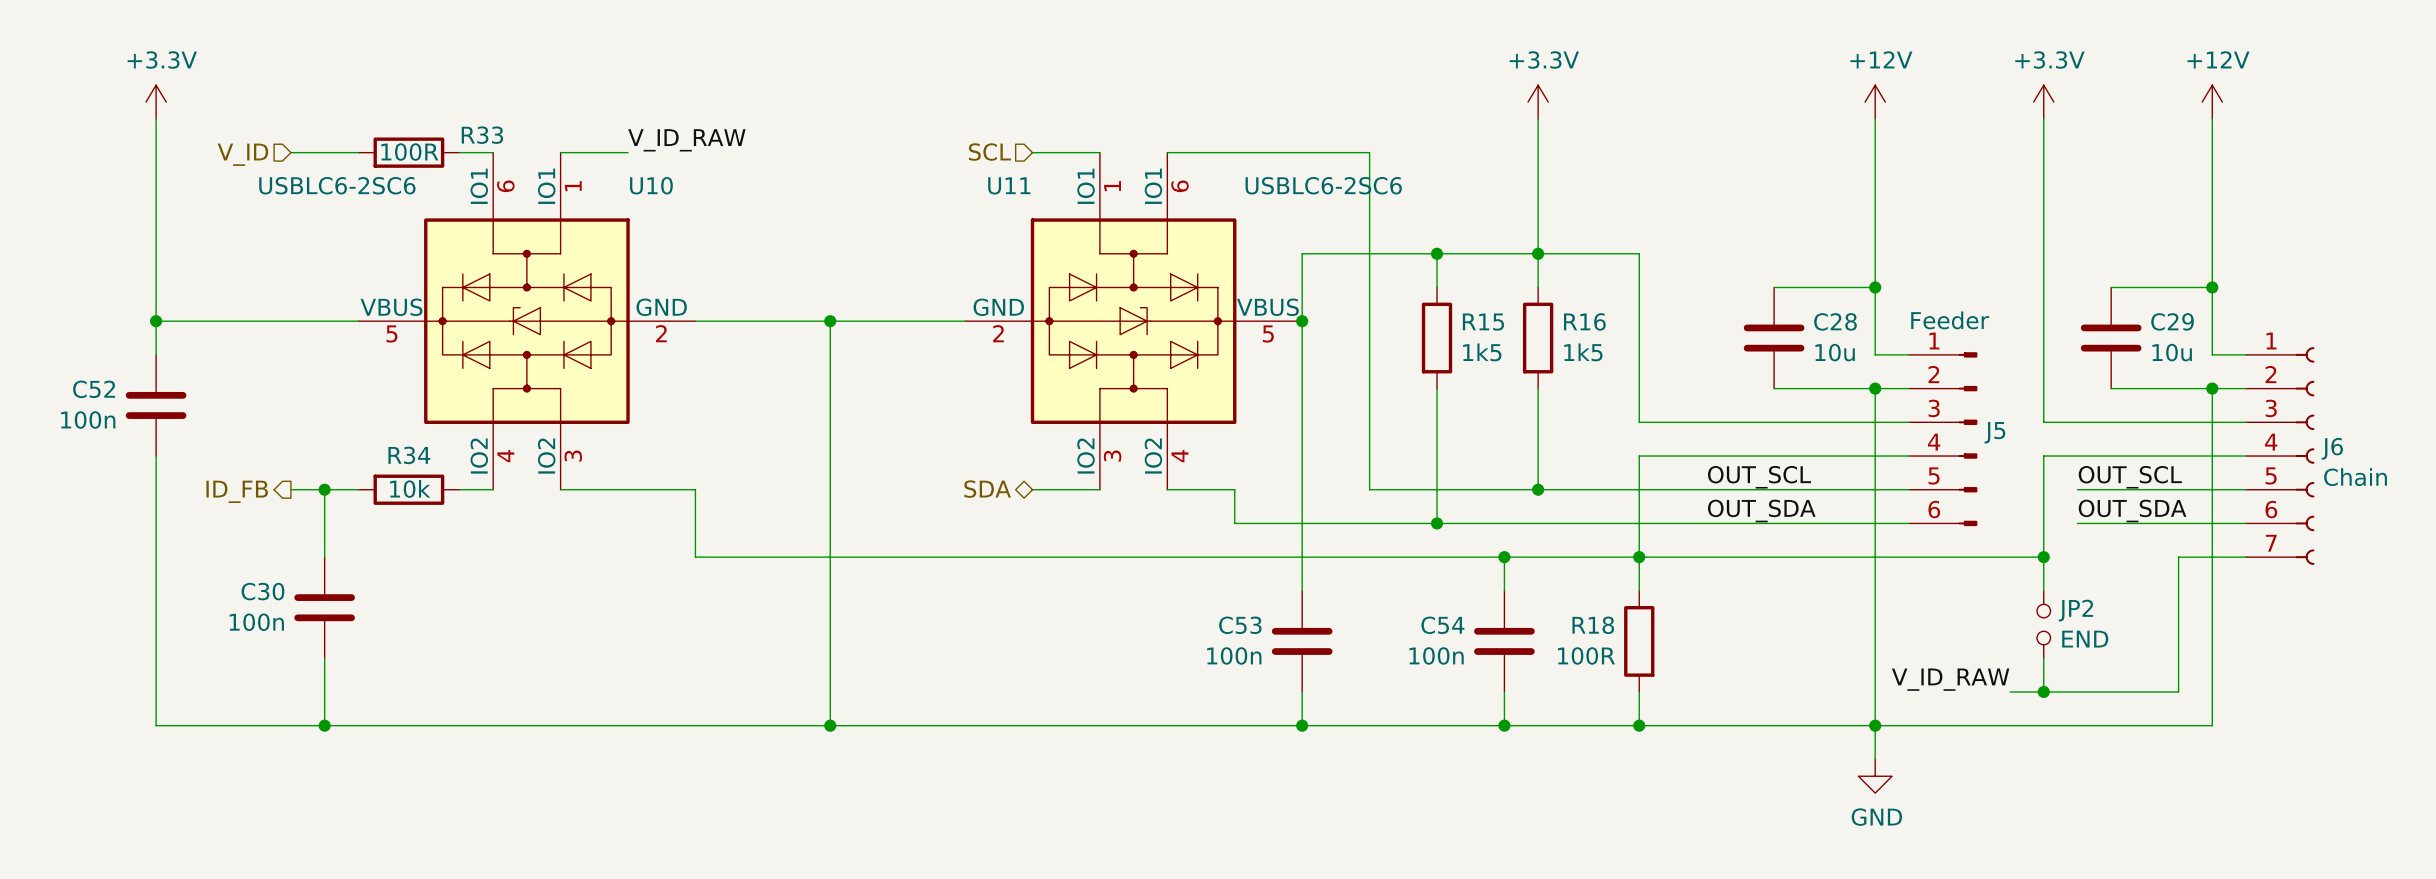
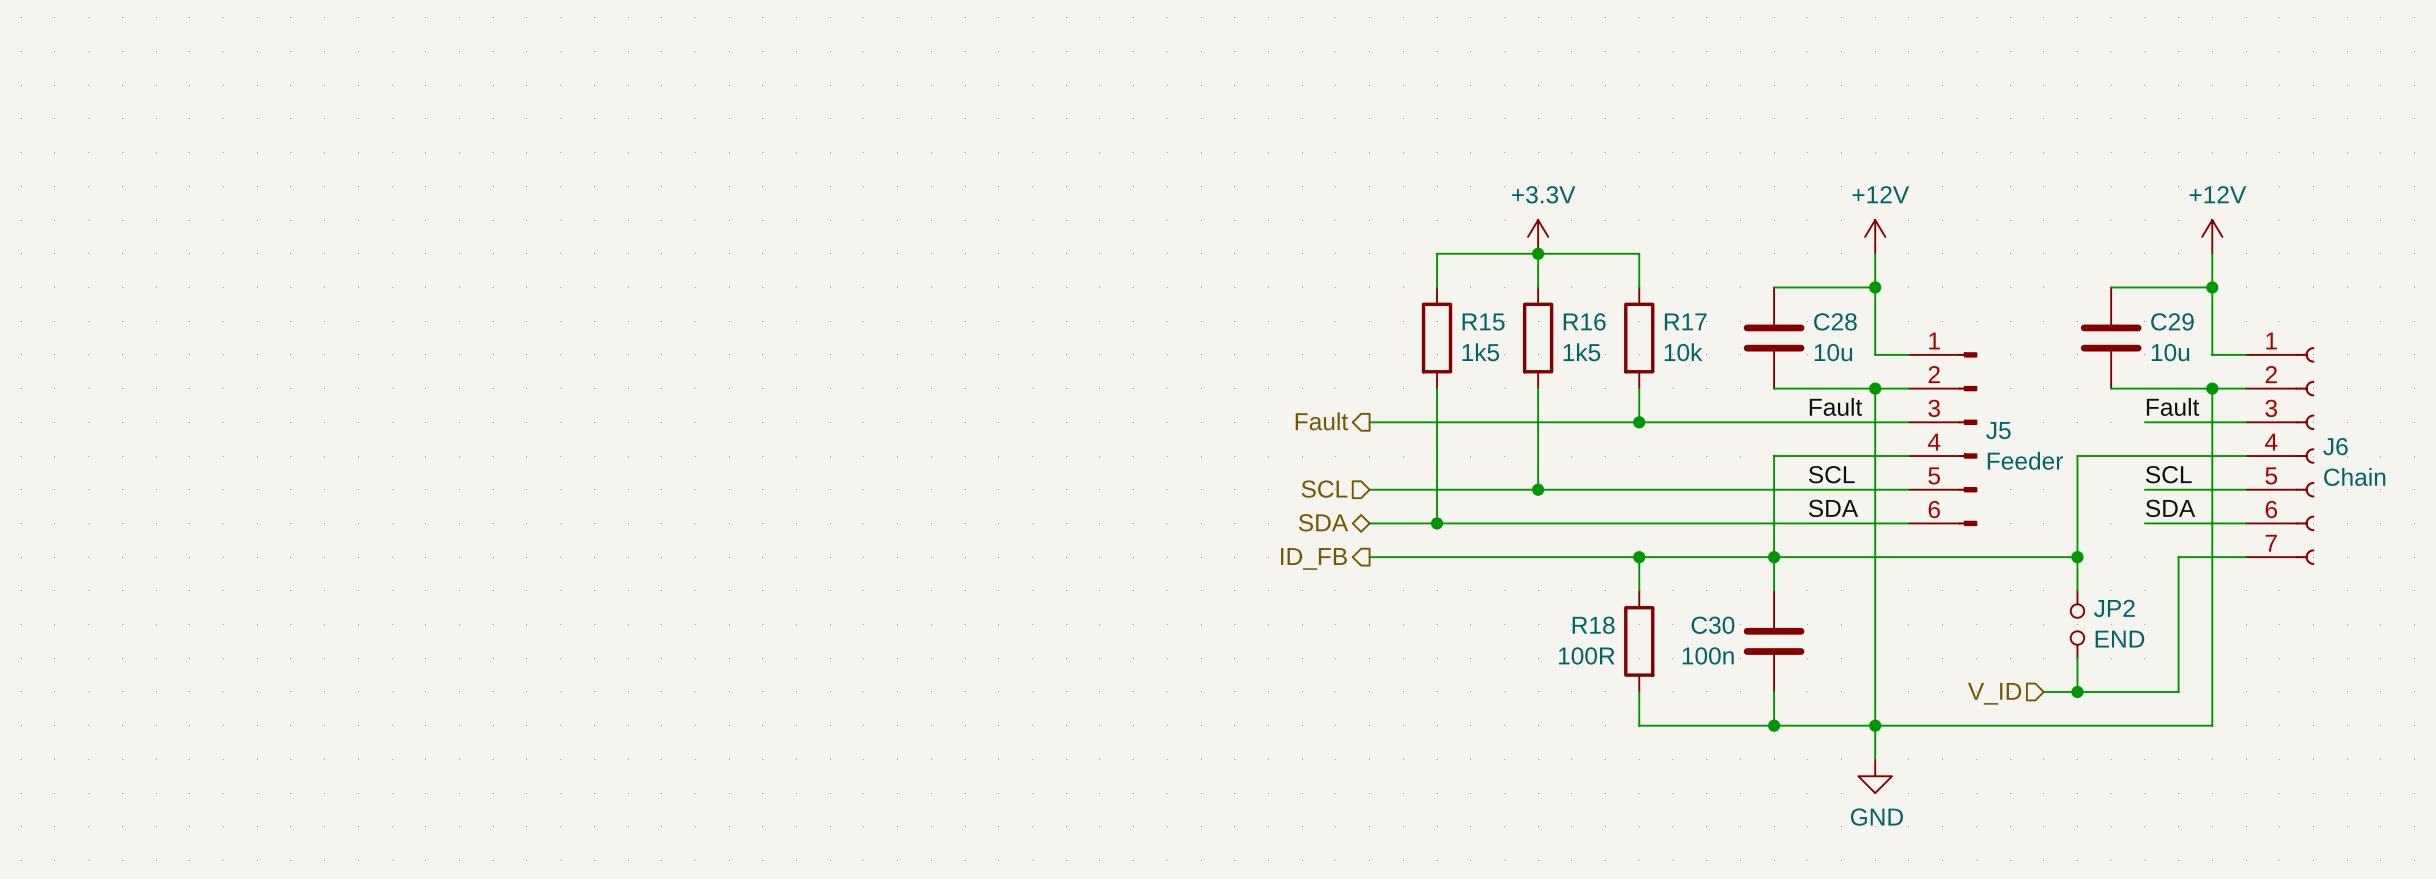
power symbol: +3.3V (156, 102) -> none
power symbol position: +3.3V (1538, 102) -> +3.3V (1538, 236)
power symbol position: +12V (1875, 102) -> +12V (1875, 236)
power symbol: +3.3V (2043, 102) -> none
power symbol position: +12V (2212, 102) -> +12V (2212, 236)
wire: (156, 118) (156, 354) -> none
wire: (1538, 118) (1538, 253) -> none
wire: (1875, 118) (1875, 253) -> none
wire: (2043, 118) (2043, 422) (2144, 422) -> none
wire: (2212, 118) (2212, 253) -> none
label: V_ID_RAW (686, 140) -> none
wire: (290, 152) (358, 152) -> none
R33: 100R (408, 152) -> none
wire: (459, 152) (493, 152) -> none
wire: (560, 152) (628, 152) -> none
hierarchical label: SCL (989, 152) -> none
wire: (1032, 152) (1099, 152) -> none
wire: (1167, 152) (1369, 152) (1369, 489) -> none
hierarchical label: V_ID (242, 154) -> none
wire: (1437, 253) (1302, 253) (1302, 590) -> none
junction: (1437, 253) -> none
wire: (1639, 287) (1639, 388) -> none
J5 value position: Feeder (1950, 320) -> Feeder (2025, 460)
wire: (156, 321) (358, 321) -> none
junction: (156, 321) -> none
U10: USBLC6-2SC6 (526, 321) -> none
wire: (695, 321) (965, 321) -> none
wire: (830, 321) (830, 725) -> none
junction: (830, 321) -> none
U11: USBLC6-2SC6 (1133, 321) -> none
junction: (1302, 321) -> none
R17: none -> 10k (1639, 338)
C52: 100n (156, 405) -> none
label: none -> Fault (1835, 406)
label: none -> Fault (2173, 406)
hierarchical label: none -> Fault (1321, 421)
wire: none -> (1369, 422) (1639, 422)
junction: none -> (1639, 422)
wire: (156, 456) (156, 725) (1639, 725) -> none
wire: (1774, 456) (1639, 456) (1639, 557) -> (1774, 456) (1774, 590)
wire: (2077, 456) (2043, 456) (2043, 590) -> (2077, 456) (2077, 590)
label: none -> SCL (1831, 474)
label: none -> SCL (2168, 474)
label: OUT_SCL (1759, 477) -> none
label: OUT_SCL (2130, 477) -> none
wire: (290, 489) (358, 489) -> none
wire: (324, 489) (324, 557) -> none
junction: (324, 489) -> none
R34: 10k (408, 489) -> none
wire: (459, 489) (493, 489) -> none
wire: (560, 489) (695, 489) (695, 557) (1369, 557) -> none
hierarchical label: SDA (987, 489) -> none
wire: (1032, 489) (1099, 489) -> none
wire: (1167, 489) (1234, 489) (1234, 523) (1369, 523) -> none
hierarchical label: none -> SCL (1324, 489)
wire: (2077, 489) (2144, 489) -> none
hierarchical label: ID_FB (237, 491) -> none
label: none -> SDA (1833, 508)
label: none -> SDA (2170, 508)
label: OUT_SDA (1761, 510) -> none
label: OUT_SDA (2132, 510) -> none
hierarchical label: none -> SDA (1323, 522)
wire: (2077, 523) (2144, 523) -> none
wire: (1504, 557) (1504, 590) -> none
junction: (1504, 557) -> none
junction: none -> (1774, 557)
wire: none -> (2043, 557) (2077, 557)
junction position: (2043, 557) -> (2077, 557)
hierarchical label: none -> ID_FB (1313, 558)
C30 position: (324, 607) -> (1774, 641)
JP2 position: (2043, 624) -> (2077, 624)
C53: 100n (1302, 641) -> none
C54: 100n (1504, 641) -> none
wire: (324, 658) (324, 725) -> none
wire: (2043, 658) (2043, 691) (2010, 691) -> none
wire: none -> (2077, 658) (2077, 691)
label: V_ID_RAW (1950, 679) -> none
wire: (1302, 691) (1302, 725) -> none
wire: (1504, 691) (1504, 725) -> (1774, 691) (1774, 725)
junction position: (2043, 691) -> (2077, 691)
hierarchical label: none -> V_ID (1994, 693)
junction: (324, 725) -> none
junction: (830, 725) -> none
junction: (1302, 725) -> none
junction: (1504, 725) -> none
junction: (1639, 725) -> none
junction: none -> (1774, 725)

